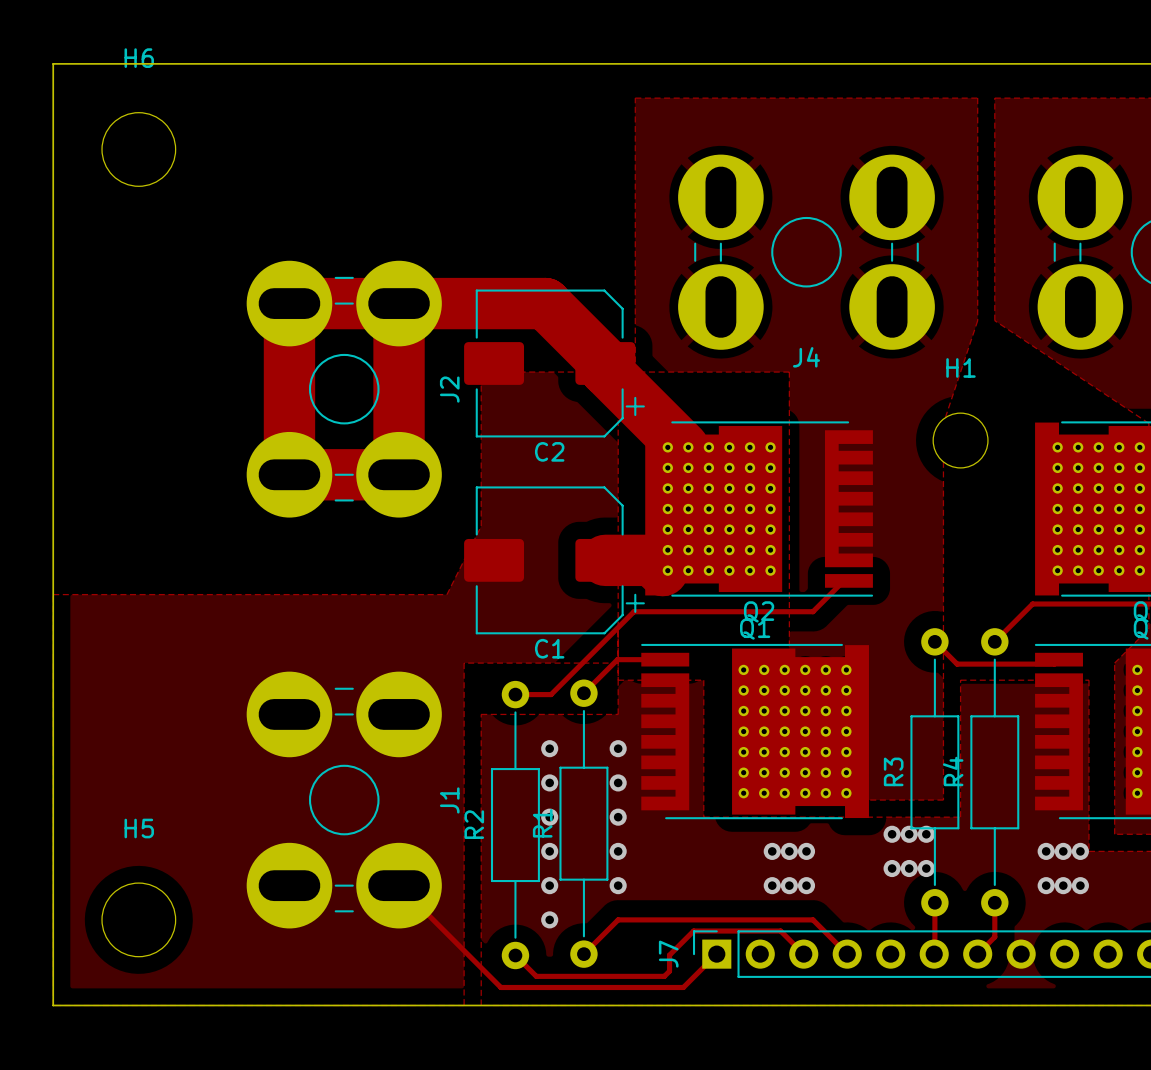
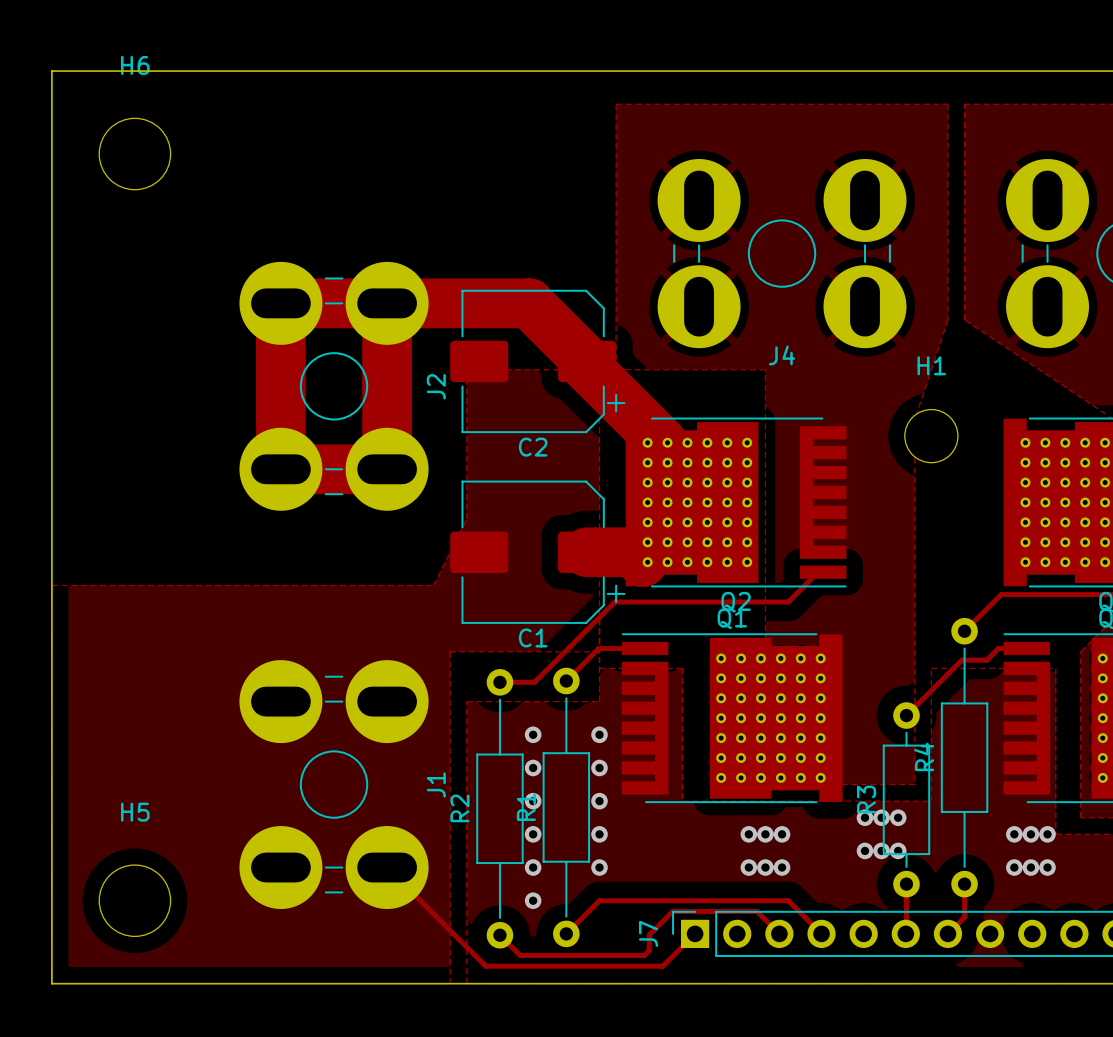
R3 footprint: [910, 628, 960, 917] -> [882, 702, 931, 898]
track: (934, 641) (957, 664) (1054, 664) (1059, 659) -> (906, 715) (961, 660) (986, 660) (998, 648) (1026, 648)

